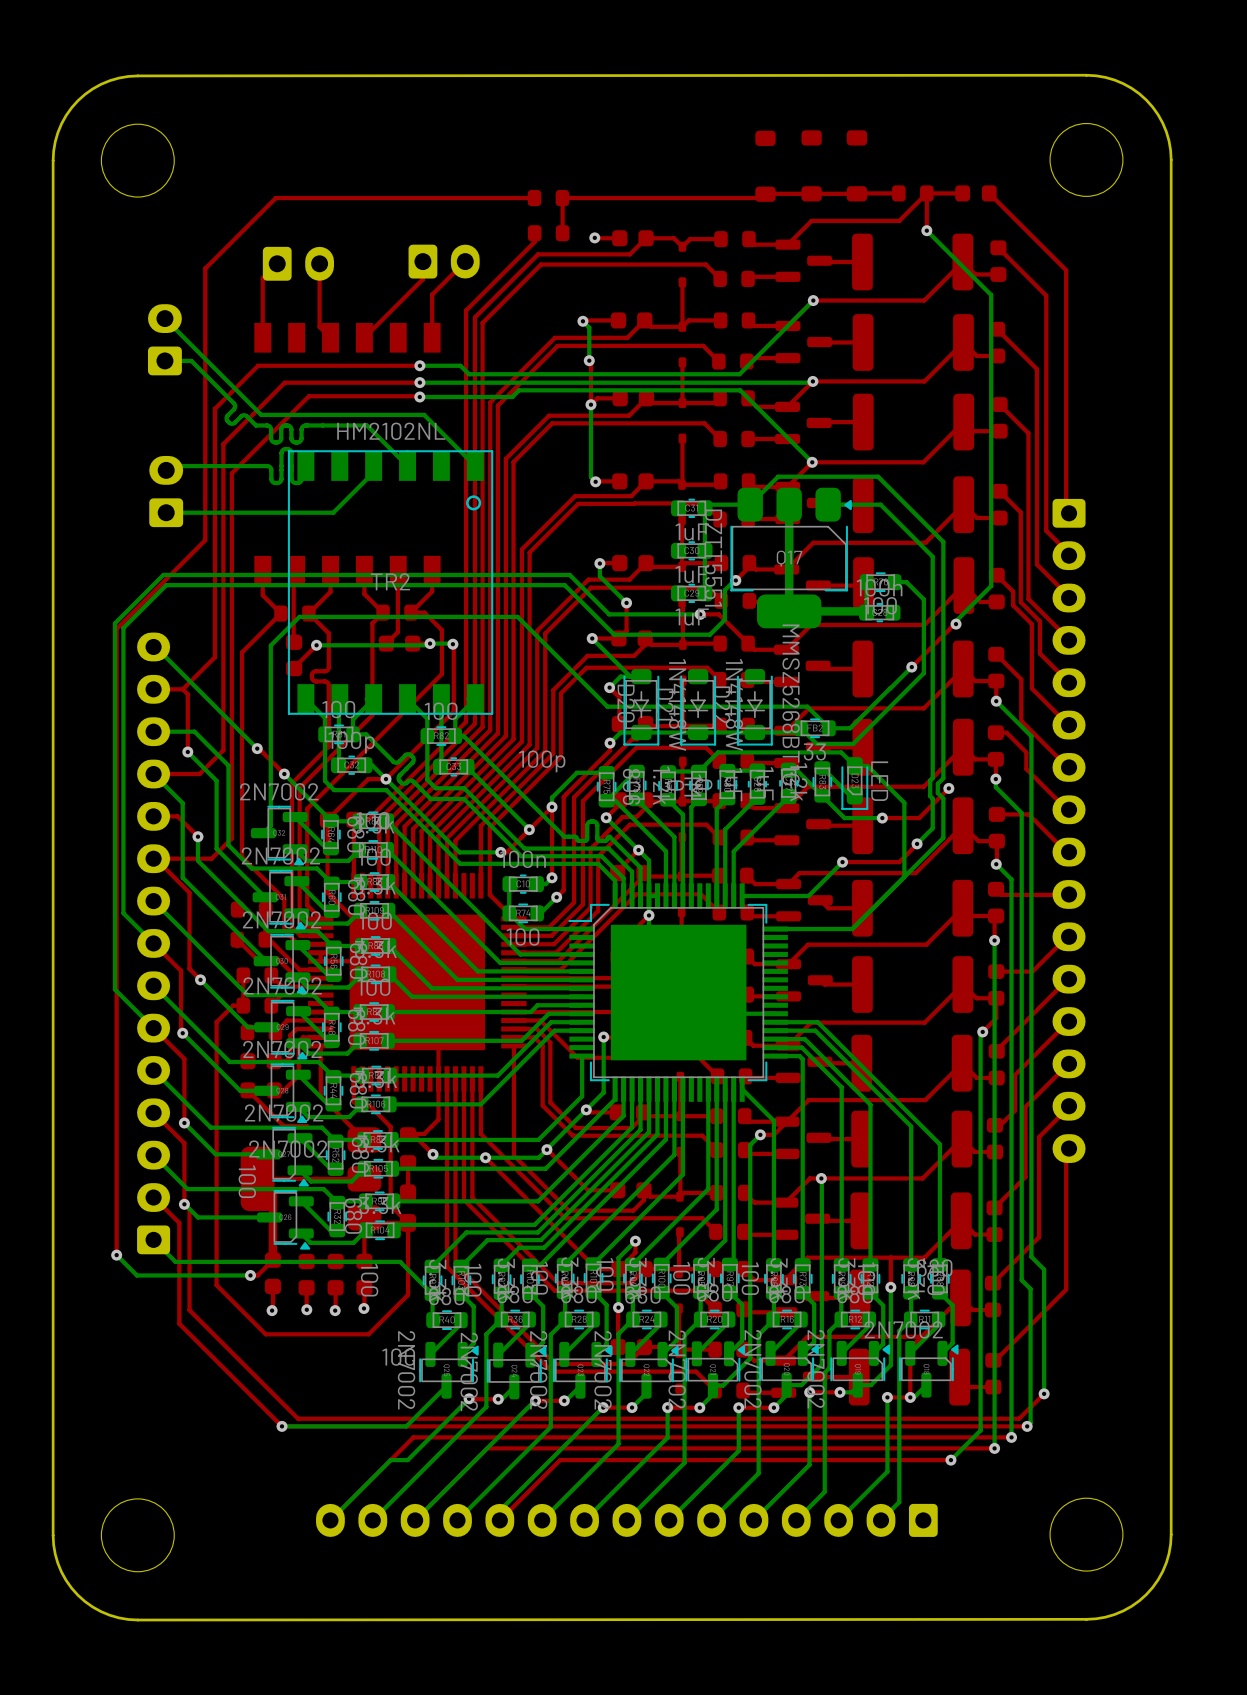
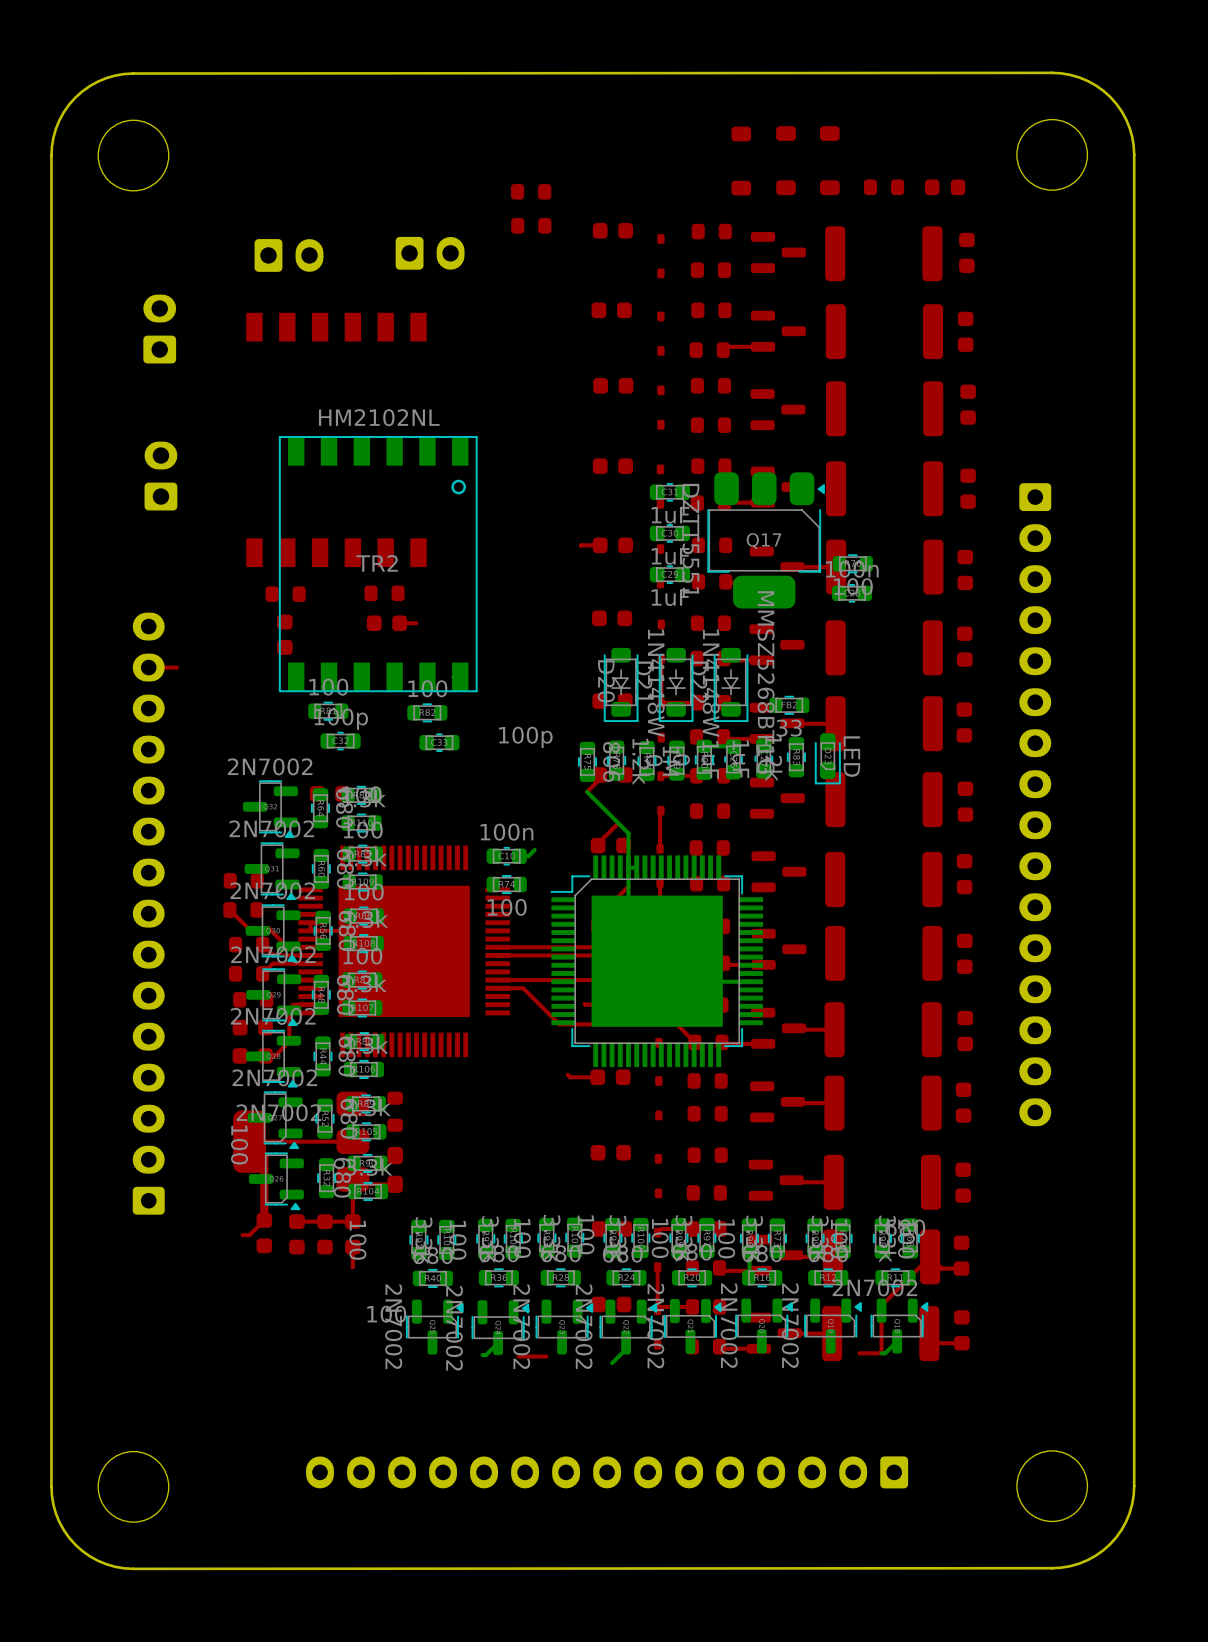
top track: (898, 193) (765, 193) (761, 198) (562, 198) -> none
top track: (926, 193) (926, 230) -> none
top track: (926, 193) (899, 220) (811, 220) (787, 244) (754, 244) (748, 239) -> none
top track: (962, 193) (926, 193) -> none
top track: (989, 193) (1066, 270) (1066, 507) -> none
top track: (534, 198) (275, 198) (205, 268) (205, 540) (116, 628) (116, 1255) -> none
top track: (562, 198) (562, 233) -> none
bottom track: (926, 230) (991, 295) (991, 585) (956, 621) (956, 624) -> none
via: (926, 230) -> none
top track: (534, 233) (534, 242) (466, 310) (466, 721) (368, 819) (353, 819) (353, 885) -> none
top track: (594, 237) (619, 238) -> none
via: (594, 237) -> none
top track: (720, 239) (690, 239) (682, 246) (673, 238) (646, 238) (629, 254) (538, 254) (474, 317) (474, 723) (379, 819) (379, 885) -> none
top track: (998, 247) (1046, 295) (1046, 530) (1066, 550) -> none
top track: (819, 260) (862, 262) -> none
top track: (422, 261) (422, 279) (364, 337) (364, 327) -> none
top track: (465, 261) (432, 294) (432, 337) -> none
top track: (277, 263) (262, 278) (262, 337) -> none
top track: (319, 263) (319, 326) (330, 337) -> none
top track: (998, 274) (975, 274) (962, 262) (924, 300) (813, 300) (787, 325) (754, 325) (748, 320) -> none
top track: (787, 276) (750, 276) (748, 278) -> none
top track: (720, 278) (705, 264) (541, 264) (482, 322) (482, 727) (387, 821) (387, 885) -> none
top track: (682, 282) (682, 326) -> none
bottom track: (813, 300) (739, 374) (469, 374) (460, 365) (419, 365) -> none
via: (813, 300) -> none
bottom track: (164, 318) (261, 414) (424, 414) (475, 466) (475, 458) -> none
top track: (618, 320) (582, 321) -> none
top track: (720, 320) (688, 320) (682, 326) -> none
bottom track: (582, 321) (589, 327) (589, 360) -> none
via: (582, 321) -> none
top track: (682, 326) (651, 326) (644, 320) (627, 337) (554, 337) (490, 402) (490, 730) (396, 824) (396, 885) -> none
top track: (997, 329) (1036, 369) (1036, 564) (1066, 593) -> none
top track: (819, 342) (863, 342) -> none
top track: (997, 355) (976, 355) (963, 342) (924, 381) (812, 381) (787, 406) (756, 406) (748, 398) -> none
bottom track: (164, 360) (191, 360) (234, 404) (234, 408) (226, 416) (229, 422) (233, 423) (241, 416) (245, 415) (255, 425) (269, 426) (271, 439) (273, 442) (280, 440) (281, 428) (284, 425) (290, 427) (291, 440) (297, 442) (301, 440) (301, 428) (304, 425) (366, 425) (407, 466) (407, 451) -> none
top track: (589, 360) (590, 362) (590, 404) (597, 398) (620, 398) -> none
via: (589, 360) -> none
top track: (718, 361) (703, 345) (557, 345) (497, 405) (497, 733) (404, 826) (404, 885) -> none
top track: (682, 362) (682, 403) -> none
top track: (419, 365) (258, 365) (214, 408) (214, 657) (182, 689) (187, 694) (187, 752) -> none
via: (419, 365) -> none
bottom track: (812, 381) (419, 382) -> none
via: (812, 381) -> none
top track: (419, 382) (284, 382) (223, 444) (223, 750) (199, 774) (153, 774) -> none
via: (419, 382) -> none
top track: (419, 396) (308, 396) (231, 473) (231, 838) (211, 858) (153, 858) -> none
bottom track: (419, 396) (512, 396) (518, 390) (740, 390) (812, 462) -> none
via: (419, 396) -> none
top track: (720, 398) (715, 403) (651, 403) (646, 398) (629, 415) (549, 415) (505, 458) (505, 736) (413, 828) (413, 885) -> none
bottom track: (590, 404) (590, 477) (595, 481) -> none
via: (590, 404) -> none
top track: (999, 404) (1028, 433) (1028, 599) (1066, 636) -> none
top track: (863, 422) (819, 422) -> none
top track: (999, 431) (972, 431) (963, 422) (923, 462) (812, 462) (787, 486) (754, 486) (748, 481) -> none
top track: (682, 438) (682, 484) -> none
top track: (720, 439) (704, 423) (552, 423) (513, 462) (513, 739) (421, 831) (421, 885) -> none
top track: (787, 439) (748, 439) -> none
via: (812, 462) -> none
bottom track: (305, 466) (302, 468) (300, 481) (293, 482) (291, 452) (285, 449) (281, 452) (281, 479) (278, 482) (271, 481) (271, 469) (267, 466) (170, 466) (166, 470) -> none
bottom track: (373, 466) (373, 472) (333, 512) (166, 512) -> none
via: (595, 481) -> none
top track: (619, 481) (595, 481) -> none
top track: (720, 481) (717, 484) (682, 484) -> none
top track: (682, 484) (678, 481) (646, 481) (631, 496) (575, 496) (521, 549) (521, 741) (430, 833) (430, 885) -> none
top track: (999, 491) (1020, 512) (1020, 602) (1039, 621) (1039, 653) (1066, 679) -> none
bottom track: (789, 504) (789, 611) -> none
bottom track: (828, 504) (880, 504) (932, 556) (932, 778) (930, 780) (930, 796) (932, 798) (932, 828) (917, 843) -> none
top track: (999, 518) (977, 518) (963, 504) (925, 542) (813, 542) (786, 569) (755, 569) (749, 563) (749, 566) (735, 580) -> none
top track: (720, 519) (704, 503) (578, 503) (529, 552) (529, 744) (438, 835) (438, 885) -> none
top track: (682, 520) (682, 566) -> none
bottom track: (599, 563) (599, 576) (626, 602) -> none
via: (599, 563) -> none
top track: (721, 563) (685, 563) (682, 566) -> none
top track: (682, 566) (649, 566) (646, 563) (629, 579) (588, 579) (537, 630) (537, 747) (446, 838) (446, 885) -> none
top track: (262, 570) (262, 595) (280, 613) (242, 652) (242, 857) (284, 899) (284, 930) (298, 944) (320, 944) -> none
top track: (296, 570) (293, 573) (294, 642) -> none
top track: (330, 570) (330, 591) (308, 613) (328, 633) (328, 668) (325, 671) (314, 671) (311, 675) (314, 681) (325, 681) (328, 684) (328, 746) (291, 783) (291, 927) (300, 935) (320, 935) -> none
top track: (364, 570) (364, 594) (383, 612) (372, 623) (372, 715) (299, 788) (299, 923) (302, 927) (320, 927) -> none
top track: (432, 570) (432, 591) (410, 612) (424, 612) (441, 630) (441, 674) (307, 808) (307, 905) (320, 918) -> none
top track: (397, 571) (397, 632) (386, 643) -> none
top track: (996, 575) (1013, 591) (1013, 605) (1031, 624) (1031, 688) (1066, 722) -> none
bottom track: (735, 580) (724, 590) (724, 619) (709, 634) (614, 634) (564, 585) (166, 585) (123, 628) (123, 913) (153, 943) -> none
via: (735, 580) -> none
bottom track: (866, 582) (866, 612) (789, 611) -> none
bottom track: (894, 582) (906, 582) (923, 599) (923, 673) (853, 743) (816, 743) (801, 728) (796, 732) (620, 732) (610, 743) -> none
bottom track: (704, 593) (704, 508) (708, 504) (750, 504) (778, 476) (878, 476) (943, 541) (943, 778) (937, 783) (937, 792) (943, 798) (943, 837) (852, 929) (775, 929) -> none
top track: (721, 600) (708, 587) (591, 587) (545, 633) (545, 750) (455, 840) (455, 885) -> none
top track: (996, 601) (980, 601) (963, 585) (924, 624) (811, 624) (786, 649) (754, 649) (718, 614) (700, 614) -> none
top track: (626, 602) (626, 630) (618, 638) (592, 638) -> none
via: (626, 602) -> none
top track: (682, 602) (682, 644) -> none
bottom track: (700, 614) (609, 614) (569, 574) (163, 574) (114, 623) (114, 989) (153, 1028) (159, 1028) -> none
via: (700, 614) -> none
top track: (956, 624) (911, 667) -> none
via: (956, 624) -> none
bottom track: (592, 638) (630, 676) -> none
via: (592, 638) -> none
via: (430, 643) -> none
top track: (720, 643) (682, 644) -> none
top track: (452, 644) (453, 711) (386, 779) (368, 779) (327, 819) (327, 892) (438, 1003) (438, 1119) (424, 1134) (408, 1134) -> none
bottom track: (452, 644) (316, 645) -> none
via: (452, 644) -> none
top track: (682, 644) (651, 644) (645, 638) (645, 644) (634, 655) (587, 655) (553, 690) (553, 753) (480, 825) (480, 885) -> none
top track: (316, 645) (294, 668) -> none
via: (316, 645) -> none
bottom track: (153, 646) (257, 748) -> none
top track: (996, 654) (1021, 679) (1021, 720) (1066, 765) -> none
top track: (818, 665) (821, 669) (862, 669) -> none
bottom track: (911, 667) (850, 728) (828, 728) (807, 706) (607, 706) (517, 616) (299, 616) (270, 645) (270, 825) (263, 833) -> none
via: (911, 667) -> none
bottom track: (641, 676) (620, 676) (609, 687) -> none
top track: (719, 680) (707, 667) (586, 667) (560, 693) (560, 756) (489, 827) (489, 894) (513, 918) -> none
top track: (609, 687) (619, 697) (619, 724) -> none
via: (609, 687) -> none
bottom track: (305, 698) (325, 718) (325, 781) (334, 790) (386, 790) (460, 863) (598, 863) (615, 880) (615, 895) -> none
bottom track: (339, 698) (338, 765) -> none
bottom track: (373, 698) (352, 719) (352, 734) (366, 734) (394, 762) (398, 762) (406, 754) (411, 755) (413, 761) (398, 776) (401, 782) (412, 781) (430, 798) (464, 798) (521, 856) (601, 856) (623, 878) (623, 895) -> none
bottom track: (407, 698) (427, 718) (427, 779) (435, 788) (464, 788) (524, 848) (608, 848) (632, 871) (632, 895) -> none
bottom track: (475, 698) (455, 718) (455, 736) (463, 736) (564, 836) (575, 836) (578, 840) (585, 840) (587, 823) (590, 821) (595, 822) (597, 840) (605, 840) (609, 836) (640, 867) (640, 895) -> none
bottom track: (440, 699) (440, 766) -> none
top track: (996, 701) (996, 681) (975, 681) (963, 669) (923, 708) (809, 708) (786, 730) (753, 730) (748, 725) -> none
bottom track: (996, 701) (1031, 736) (1031, 1256) (1044, 1269) (1044, 1393) -> none
via: (996, 701) -> none
top track: (682, 726) (647, 726) (645, 724) (645, 730) (637, 739) (632, 739) (574, 797) (574, 902) (549, 927) (513, 927) -> none
bottom track: (153, 731) (194, 731) (228, 765) (228, 845) (251, 868) (317, 868) (331, 883) (360, 882) -> none
top track: (995, 732) (1006, 732) (1026, 752) (1026, 769) (1066, 808) -> none
top track: (610, 743) (610, 750) (566, 794) -> none
via: (610, 743) -> none
top track: (257, 748) (284, 774) -> none
via: (257, 748) -> none
bottom track: (187, 752) (216, 780) (216, 848) (265, 897) -> none
via: (187, 752) -> none
top track: (719, 760) (706, 747) (636, 747) (582, 801) (582, 904) (551, 935) (513, 935) -> none
top track: (682, 761) (682, 801) (645, 800) (645, 807) (636, 816) (622, 816) (590, 848) (590, 907) (553, 944) (513, 944) -> none
bottom track: (364, 765) (372, 765) (386, 779) -> none
bottom track: (466, 766) (526, 826) -> none
bottom track: (822, 767) (850, 795) (854, 795) -> none
bottom track: (788, 770) (796, 770) (844, 818) (882, 818) -> none
bottom track: (636, 771) (606, 800) (615, 800) (665, 851) (665, 895) -> none
bottom track: (668, 771) (698, 771) (718, 752) (841, 752) (854, 765) (867, 765) (904, 802) (904, 876) -> none
bottom track: (606, 772) (577, 772) (552, 797) (552, 807) -> none
bottom track: (153, 774) (182, 803) (182, 877) (266, 961) -> none
bottom track: (284, 774) (331, 821) (359, 821) -> none
via: (284, 774) -> none
bottom track: (386, 779) (459, 852) (500, 852) -> none
via: (386, 779) -> none
top track: (995, 779) (995, 759) (975, 759) (963, 747) (923, 786) (808, 786) (786, 808) (754, 808) (747, 801) -> none
bottom track: (995, 779) (995, 787) (1021, 812) (1021, 1280) (1030, 1289) (1030, 1422) (1027, 1426) -> none
via: (995, 779) -> none
top track: (948, 788) (919, 818) (882, 818) -> none
via: (948, 788) -> none
top track: (566, 794) (563, 797) (563, 890) (556, 897) -> none
bottom track: (788, 796) (733, 851) (733, 895) -> none
bottom track: (757, 797) (725, 829) (725, 895) -> none
bottom track: (727, 798) (716, 809) (716, 895) -> none
bottom track: (636, 799) (674, 837) (674, 895) -> none
bottom track: (668, 799) (682, 814) (682, 895) -> none
bottom track: (698, 799) (691, 807) (691, 895) -> none
via: (552, 807) -> none
top track: (996, 814) (1028, 814) (1066, 851) -> none
top track: (153, 816) (177, 816) (197, 836) -> none
bottom track: (295, 817) (326, 848) (330, 848) -> none
via: (606, 817) -> none
via: (882, 818) -> none
bottom track: (387, 821) (520, 954) (582, 954) -> none
top track: (818, 824) (862, 825) -> none
via: (529, 829) -> none
bottom track: (197, 836) (197, 860) (268, 931) (317, 931) (333, 947) (361, 945) -> none
via: (197, 836) -> none
top track: (719, 837) (706, 824) (629, 824) (598, 856) (598, 910) (556, 952) (513, 952) -> none
top track: (747, 837) (750, 840) (786, 840) -> none
top track: (917, 843) (899, 862) (842, 862) -> none
via: (917, 843) -> none
bottom track: (295, 849) (306, 860) (348, 860) (359, 849) -> none
bottom track: (387, 849) (500, 962) (582, 962) -> none
via: (638, 850) -> none
top track: (500, 852) (506, 852) (552, 807) (552, 877) -> none
via: (500, 852) -> none
top track: (155, 858) (189, 892) (189, 968) (200, 979) -> none
bottom track: (842, 862) (808, 895) (742, 895) -> none
via: (842, 862) -> none
top track: (996, 864) (996, 841) (978, 841) (963, 825) (915, 873) (799, 873) (788, 884) (755, 884) (746, 875) -> none
bottom track: (996, 864) (1011, 879) (1011, 1437) -> none
via: (996, 864) -> none
top track: (718, 875) (647, 876) (643, 873) (643, 875) (558, 961) (513, 961) -> none
via: (552, 877) -> none
bottom track: (296, 881) (326, 911) (331, 911) -> none
bottom track: (388, 882) (477, 971) (582, 971) -> none
bottom track: (510, 884) (509, 913) (524, 929) (582, 929) -> none
top track: (996, 889) (1001, 894) (1066, 894) -> none
bottom track: (556, 897) (540, 913) (537, 913) -> none
via: (556, 897) -> none
top track: (820, 900) (828, 908) (862, 908) -> none
bottom track: (153, 901) (247, 995) (313, 995) (331, 1013) (360, 1012) -> none
top track: (265, 909) (265, 939) (269, 939) (299, 969) (320, 969) -> none
bottom track: (360, 910) (347, 923) (307, 923) (296, 913) -> none
bottom track: (388, 910) (457, 979) (582, 979) -> none
top track: (719, 912) (701, 894) (636, 894) (560, 969) (513, 969) -> none
top track: (747, 912) (751, 916) (788, 916) -> none
via: (649, 915) -> none
top track: (1066, 937) (1032, 971) (996, 971) -> none
top track: (994, 940) (996, 916) (970, 916) (962, 908) (926, 944) (808, 944) (788, 964) (754, 964) (747, 956) -> none
bottom track: (994, 940) (994, 1448) -> none
via: (994, 940) -> none
top track: (153, 943) (181, 970) (181, 1031) (182, 1033) -> none
bottom track: (297, 945) (327, 975) (333, 975) -> none
bottom track: (389, 945) (431, 988) (582, 988) -> none
bottom track: (361, 974) (348, 987) (308, 987) (297, 977) -> none
bottom track: (389, 974) (412, 996) (582, 996) -> none
top track: (243, 975) (243, 1005) (233, 1005) (216, 1022) (216, 1285) (265, 1334) (368, 1334) (408, 1294) (408, 1222) (390, 1205) (390, 1126) (369, 1105) (357, 1105) (353, 1101) (353, 1078) -> none
bottom track: (200, 979) (247, 1027) (266, 1027) -> none
via: (200, 979) -> none
top track: (820, 980) (824, 984) (862, 984) -> none
top track: (1066, 980) (996, 1051) -> none
bottom track: (153, 985) (229, 1062) (318, 1062) (333, 1076) (362, 1075) -> none
bottom track: (582, 1005) (537, 1005) (530, 1012) (388, 1012) -> none
bottom track: (298, 1011) (328, 1041) (331, 1041) -> none
bottom track: (582, 1013) (548, 1013) (521, 1040) (388, 1040) -> none
top track: (320, 1020) (287, 1020) (275, 1032) -> none
bottom track: (582, 1022) (551, 1022) (497, 1075) (390, 1075) -> none
bottom track: (775, 1022) (817, 1022) (939, 1144) (939, 1264) -> none
top track: (1066, 1023) (1014, 1075) (1014, 1110) (1000, 1125) (995, 1125) -> none
top track: (153, 1028) (184, 1058) (184, 1122) -> none
top track: (320, 1028) (296, 1028) (290, 1035) (290, 1056) (286, 1061) (274, 1061) -> none
top track: (513, 1028) (536, 1028) (550, 1042) (550, 1102) (575, 1128) (631, 1128) (643, 1116) (643, 1112) (647, 1116) (716, 1116) -> none
bottom track: (582, 1030) (554, 1030) (480, 1104) (389, 1104) -> none
bottom track: (775, 1030) (815, 1030) (911, 1126) (911, 1264) -> none
top track: (982, 1031) (996, 1018) (996, 998) (976, 998) (962, 984) (924, 1022) (811, 1022) (788, 1045) (753, 1045) (745, 1037) -> none
bottom track: (982, 1031) (980, 1034) (980, 1430) (950, 1460) -> none
via: (982, 1031) -> none
bottom track: (182, 1033) (240, 1090) (266, 1090) -> none
via: (182, 1033) -> none
top track: (513, 1037) (534, 1037) (542, 1045) (542, 1105) (572, 1135) (702, 1135) (716, 1150) -> none
bottom track: (603, 1037) (603, 1092) (538, 1157) (436, 1157) (433, 1154) -> none
via: (603, 1037) -> none
bottom track: (775, 1039) (804, 1039) (870, 1104) (870, 1264) -> none
bottom track: (360, 1040) (347, 1053) (308, 1053) (298, 1043) -> none
top track: (320, 1045) (320, 1096) (364, 1139) -> none
top track: (513, 1045) (513, 1155) (568, 1210) (633, 1210) (643, 1200) (643, 1190) (650, 1196) (679, 1196) -> none
bottom track: (775, 1047) (801, 1047) (841, 1087) (841, 1264) -> none
bottom track: (582, 1056) (582, 1096) (538, 1139) (391, 1139) -> none
bottom track: (775, 1056) (799, 1056) (802, 1059) (802, 1264) -> none
top track: (1066, 1067) (1025, 1106) (1025, 1176) (994, 1207) -> none
bottom track: (153, 1070) (210, 1127) (322, 1127) (335, 1141) (363, 1139) -> none
bottom track: (298, 1074) (328, 1104) (333, 1104) -> none
top track: (680, 1076) (680, 1116) -> none
top track: (996, 1077) (976, 1077) (962, 1063) (925, 1100) (808, 1100) (773, 1134) (760, 1134) -> none
top track: (446, 1078) (446, 1266) (551, 1371) (696, 1371) (715, 1390) -> none
top track: (455, 1078) (455, 1264) (554, 1363) (627, 1363) (644, 1347) (673, 1347) (679, 1352) -> none
top track: (463, 1078) (463, 1199) (554, 1290) (696, 1290) (715, 1309) -> none
top track: (472, 1078) (472, 1197) (557, 1283) (631, 1283) (645, 1269) (675, 1269) (679, 1272) (679, 1232) -> none
top track: (480, 1078) (480, 1134) (565, 1218) (702, 1218) (715, 1231) -> none
bottom track: (615, 1089) (615, 1099) (545, 1168) (392, 1168) -> none
bottom track: (623, 1089) (623, 1115) (538, 1201) (393, 1201) -> none
bottom track: (632, 1089) (632, 1127) (534, 1224) (399, 1224) (394, 1230) -> none
bottom track: (640, 1089) (640, 1129) (537, 1232) (466, 1232) (432, 1266) (432, 1263) -> none
bottom track: (649, 1089) (649, 1132) (540, 1240) (487, 1240) (461, 1266) -> none
bottom track: (657, 1089) (657, 1134) (544, 1247) (519, 1247) (501, 1265) -> none
bottom track: (665, 1089) (665, 1139) (540, 1265) (529, 1265) -> none
bottom track: (674, 1089) (674, 1154) (564, 1264) -> none
bottom track: (682, 1089) (682, 1174) (593, 1264) -> none
bottom track: (708, 1089) (708, 1189) (632, 1264) (640, 1264) -> none
bottom track: (716, 1089) (716, 1209) (661, 1264) -> none
bottom track: (725, 1089) (725, 1240) (701, 1264) -> none
bottom track: (733, 1089) (733, 1260) (729, 1264) -> none
bottom track: (742, 1089) (773, 1120) (773, 1264) -> none
top track: (247, 1090) (283, 1125) (307, 1125) -> none
bottom track: (361, 1104) (349, 1117) (308, 1117) (298, 1106) -> none
via: (586, 1109) -> none
top track: (1066, 1110) (1039, 1137) (1039, 1237) (992, 1283) -> none
top track: (153, 1112) (184, 1143) (184, 1204) (189, 1209) (189, 1310) (298, 1418) (1019, 1418) (1044, 1393) -> none
top track: (744, 1116) (750, 1121) (787, 1121) -> none
bottom track: (184, 1122) (215, 1154) (268, 1154) -> none
via: (184, 1122) -> none
top track: (412, 1134) (433, 1154) -> none
bottom track: (760, 1134) (750, 1145) (750, 1358) (723, 1385) (712, 1385) (712, 1394) (699, 1407) -> none
via: (760, 1134) -> none
bottom track: (300, 1138) (330, 1169) (335, 1169) -> none
top track: (546, 1149) (588, 1190) (617, 1190) -> none
via: (546, 1149) -> none
top track: (744, 1150) (748, 1153) (787, 1153) -> none
top track: (680, 1151) (679, 1196) -> none
top track: (995, 1152) (974, 1152) (961, 1139) (922, 1178) (809, 1178) (785, 1202) (754, 1202) (744, 1192) -> none
top track: (1066, 1153) (1066, 1289) (993, 1360) -> none
via: (433, 1154) -> none
bottom track: (153, 1155) (187, 1189) (323, 1189) (337, 1202) (365, 1201) -> none
top track: (485, 1157) (596, 1269) (618, 1269) (635, 1252) (635, 1241) -> none
via: (485, 1157) -> none
top track: (408, 1161) (408, 1193) -> none
bottom track: (364, 1168) (351, 1181) (311, 1181) (300, 1170) -> none
bottom track: (821, 1178) (821, 1364) (801, 1385) (786, 1385) (786, 1395) (773, 1407) -> none
via: (821, 1178) -> none
top track: (716, 1192) (683, 1192) (679, 1196) -> none
top track: (153, 1197) (179, 1222) (179, 1323) (281, 1426) (1027, 1426) -> none
bottom track: (301, 1201) (330, 1230) (337, 1230) -> none
bottom track: (184, 1204) (197, 1217) (269, 1217) -> none
via: (184, 1204) -> none
bottom track: (366, 1230) (353, 1242) (310, 1242) (301, 1233) -> none
top track: (743, 1231) (746, 1234) (785, 1234) -> none
top track: (994, 1234) (975, 1234) (961, 1220) (924, 1257) (807, 1257) (784, 1280) (754, 1280) (743, 1269) -> none
bottom track: (153, 1239) (175, 1261) (400, 1261) (432, 1294) (433, 1320) -> none
bottom track: (635, 1241) (618, 1258) (618, 1307) -> none
via: (635, 1241) -> none
bottom track: (116, 1255) (136, 1275) (250, 1275) -> none
via: (116, 1255) -> none
top track: (890, 1257) (890, 1287) -> none
via: (250, 1275) -> none
top track: (272, 1286) (272, 1310) -> none
top track: (306, 1287) (306, 1309) -> none
top track: (335, 1287) (335, 1310) -> none
bottom track: (890, 1287) (890, 1365) (870, 1385) (857, 1385) (851, 1392) (840, 1392) -> none
via: (890, 1287) -> none
bottom track: (593, 1291) (606, 1305) (606, 1344) (596, 1354) -> none
bottom track: (564, 1292) (565, 1320) (550, 1334) (550, 1427) (457, 1520) -> none
bottom track: (632, 1292) (632, 1319) (618, 1333) (618, 1444) (542, 1520) -> none
bottom track: (661, 1292) (676, 1307) (676, 1340) (662, 1354) -> none
bottom track: (701, 1292) (700, 1319) (684, 1335) (684, 1462) (626, 1520) -> none
bottom track: (729, 1292) (742, 1304) (742, 1340) (729, 1353) -> none
bottom track: (802, 1292) (814, 1304) (814, 1341) (802, 1353) -> none
bottom track: (870, 1292) (883, 1305) (883, 1344) (873, 1353) -> none
bottom track: (939, 1292) (952, 1305) (952, 1343) (942, 1353) -> none
bottom track: (501, 1293) (501, 1319) (486, 1334) (486, 1406) (372, 1520) (379, 1520) -> none
bottom track: (529, 1293) (543, 1306) (543, 1342) (530, 1355) -> none
bottom track: (461, 1294) (473, 1306) (473, 1343) (462, 1354) -> none
bottom track: (842, 1294) (841, 1293) (841, 1319) (829, 1331) (829, 1367) (824, 1372) (824, 1491) (796, 1520) -> none
bottom track: (912, 1294) (911, 1292) (911, 1319) (899, 1330) (899, 1502) (880, 1520) -> none
top track: (618, 1307) (618, 1347) -> none
via: (618, 1307) -> none
via: (363, 1308) -> none
via: (306, 1309) -> none
via: (272, 1310) -> none
via: (335, 1310) -> none
bottom track: (529, 1319) (529, 1324) (498, 1355) -> none
bottom track: (593, 1319) (593, 1325) (564, 1354) -> none
bottom track: (660, 1319) (660, 1323) (630, 1354) -> none
bottom track: (728, 1319) (728, 1322) (696, 1353) -> none
bottom track: (773, 1319) (758, 1334) (758, 1473) (711, 1520) (711, 1515) -> none
bottom track: (801, 1319) (801, 1322) (770, 1353) -> none
bottom track: (869, 1319) (869, 1325) (841, 1353) -> none
bottom track: (938, 1319) (938, 1325) (910, 1353) -> none
bottom track: (460, 1320) (460, 1323) (430, 1354) -> none
top track: (921, 1336) (807, 1336) (783, 1360) (754, 1360) (743, 1349) -> none
bottom track: (446, 1386) (406, 1426) (281, 1426) -> none
bottom track: (580, 1386) (564, 1400) -> none
bottom track: (809, 1392) (809, 1464) (753, 1520) -> none
via: (809, 1392) -> none
top track: (840, 1392) (809, 1392) -> none
via: (840, 1392) -> none
via: (1044, 1393) -> none
bottom track: (887, 1397) (887, 1471) (838, 1520) -> none
via: (887, 1397) -> none
via: (910, 1397) -> none
top track: (469, 1398) (498, 1399) -> none
bottom track: (469, 1398) (407, 1460) (390, 1460) (330, 1520) -> none
via: (469, 1398) -> none
via: (498, 1399) -> none
bottom track: (535, 1400) (415, 1520) (418, 1520) -> none
via: (535, 1400) -> none
via: (564, 1400) -> none
bottom track: (603, 1407) (499, 1510) (499, 1520) -> none
via: (603, 1407) -> none
top track: (632, 1407) (603, 1407) -> none
via: (632, 1407) -> none
bottom track: (667, 1407) (667, 1437) (584, 1520) -> none
via: (667, 1407) -> none
top track: (699, 1407) (667, 1407) -> none
via: (699, 1407) -> none
bottom track: (738, 1407) (738, 1450) (669, 1520) -> none
via: (738, 1407) -> none
top track: (773, 1407) (738, 1407) -> none
via: (773, 1407) -> none
via: (281, 1426) -> none
via: (1027, 1426) -> none
top track: (1011, 1437) (413, 1437) (330, 1520) -> none
via: (1011, 1437) -> none
top track: (994, 1448) (487, 1448) (415, 1520) -> none
via: (994, 1448) -> none
top track: (950, 1460) (560, 1460) (499, 1520) -> none
via: (950, 1460) -> none

